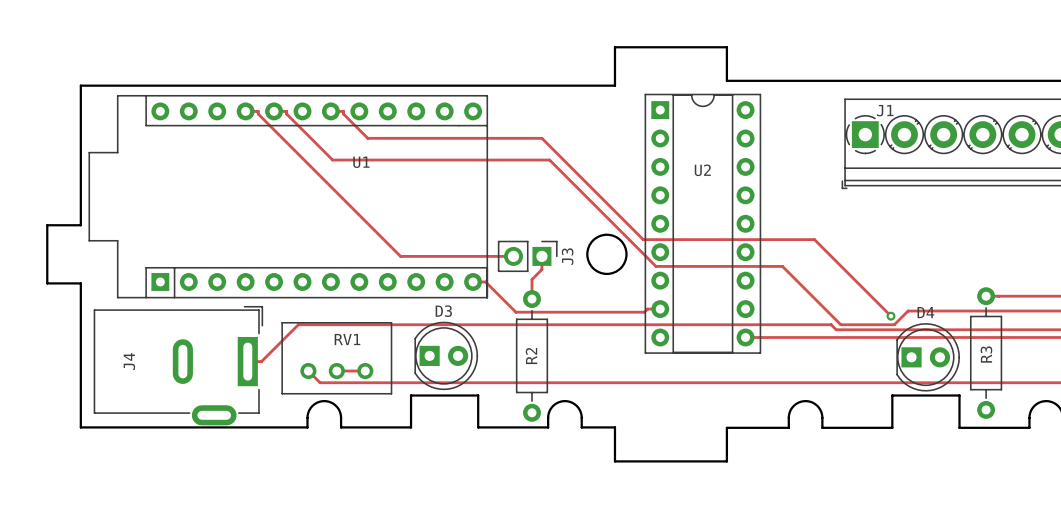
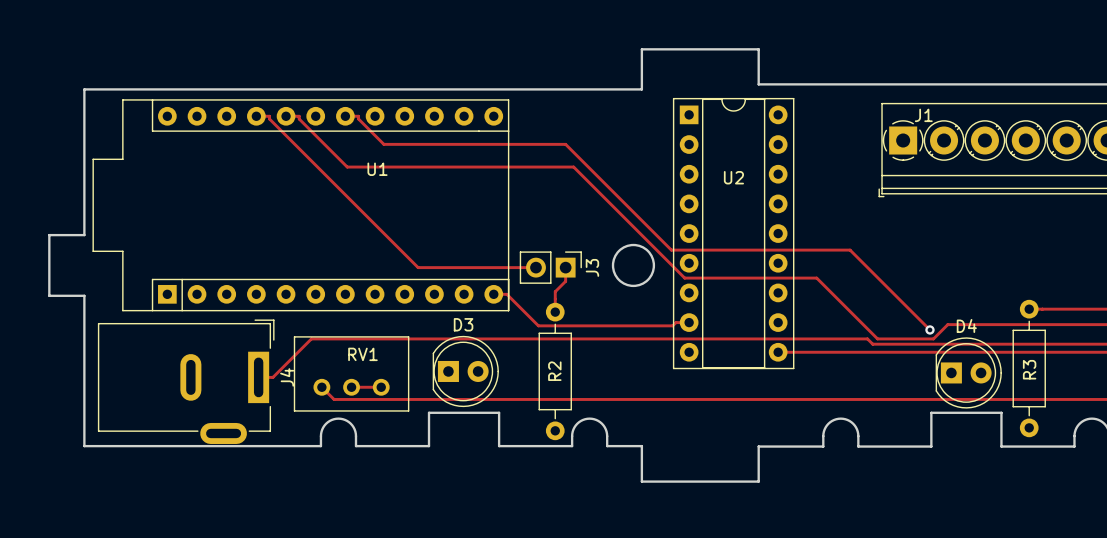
J4 name position: J4 (129, 361) -> J4 (287, 377)

